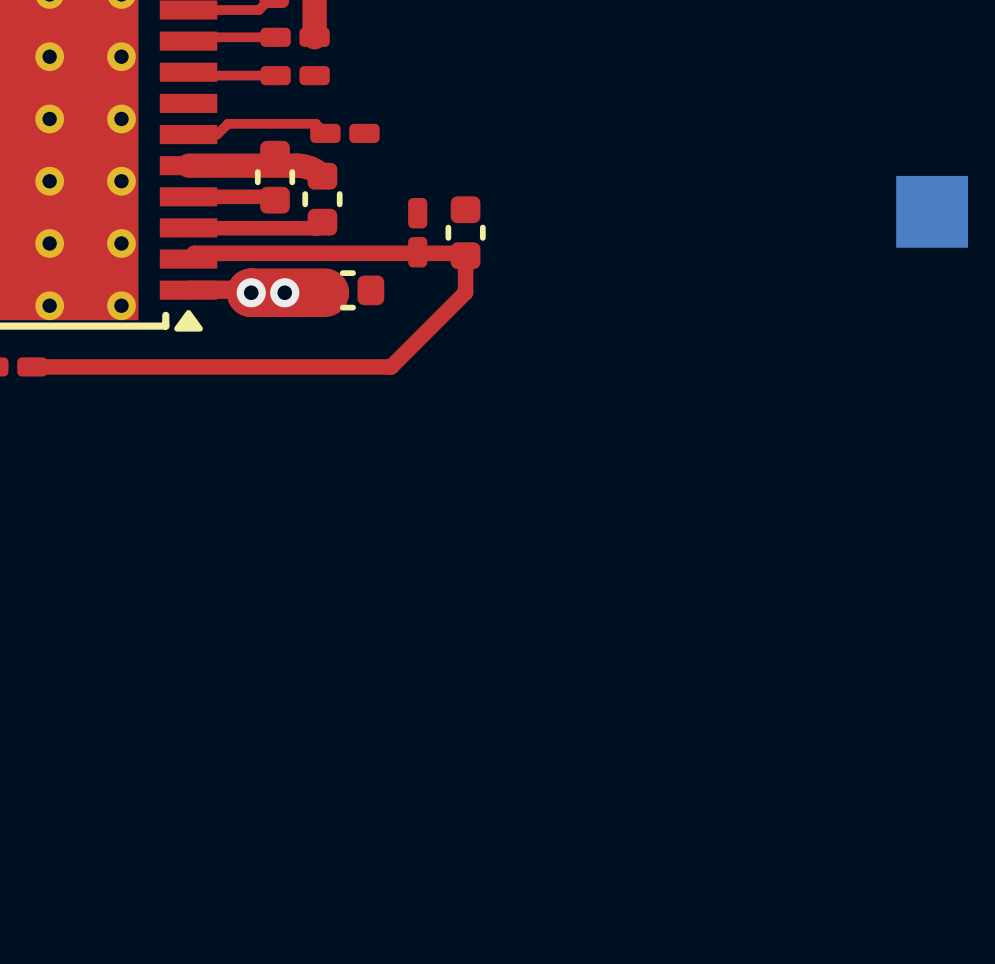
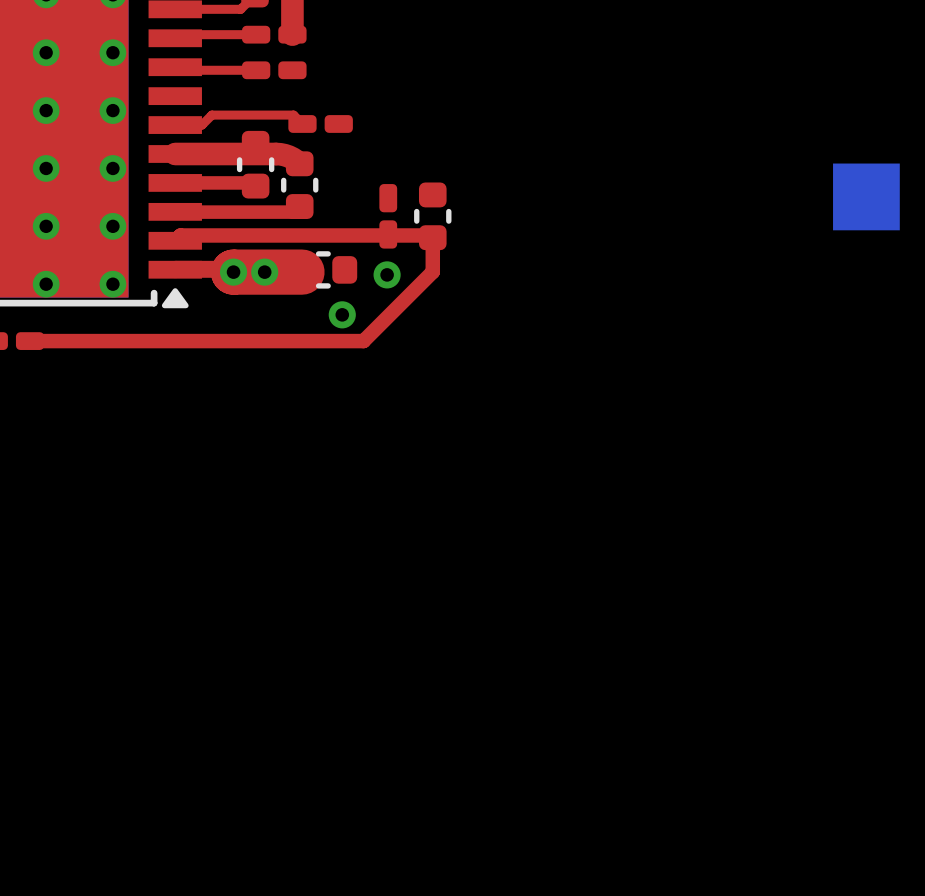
via: none -> (387, 274)
via: none -> (342, 314)

